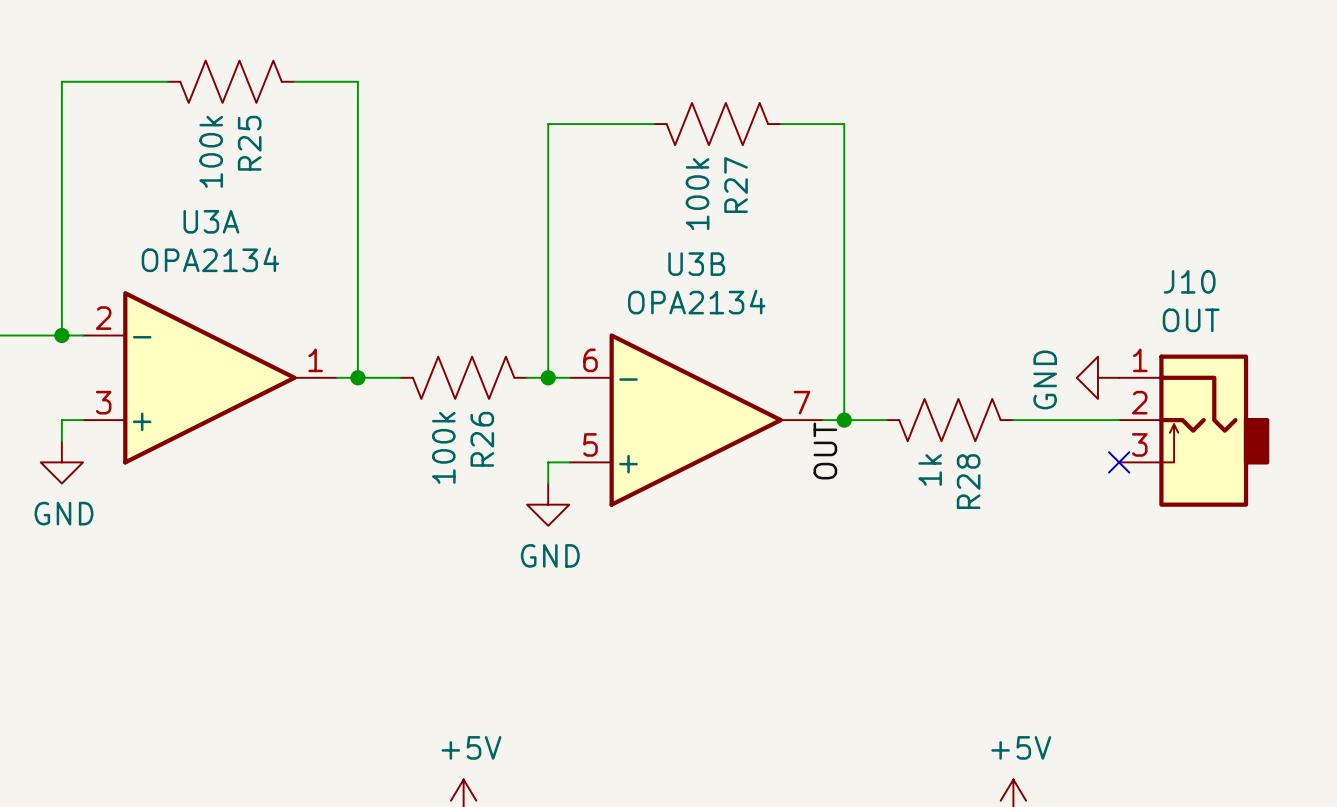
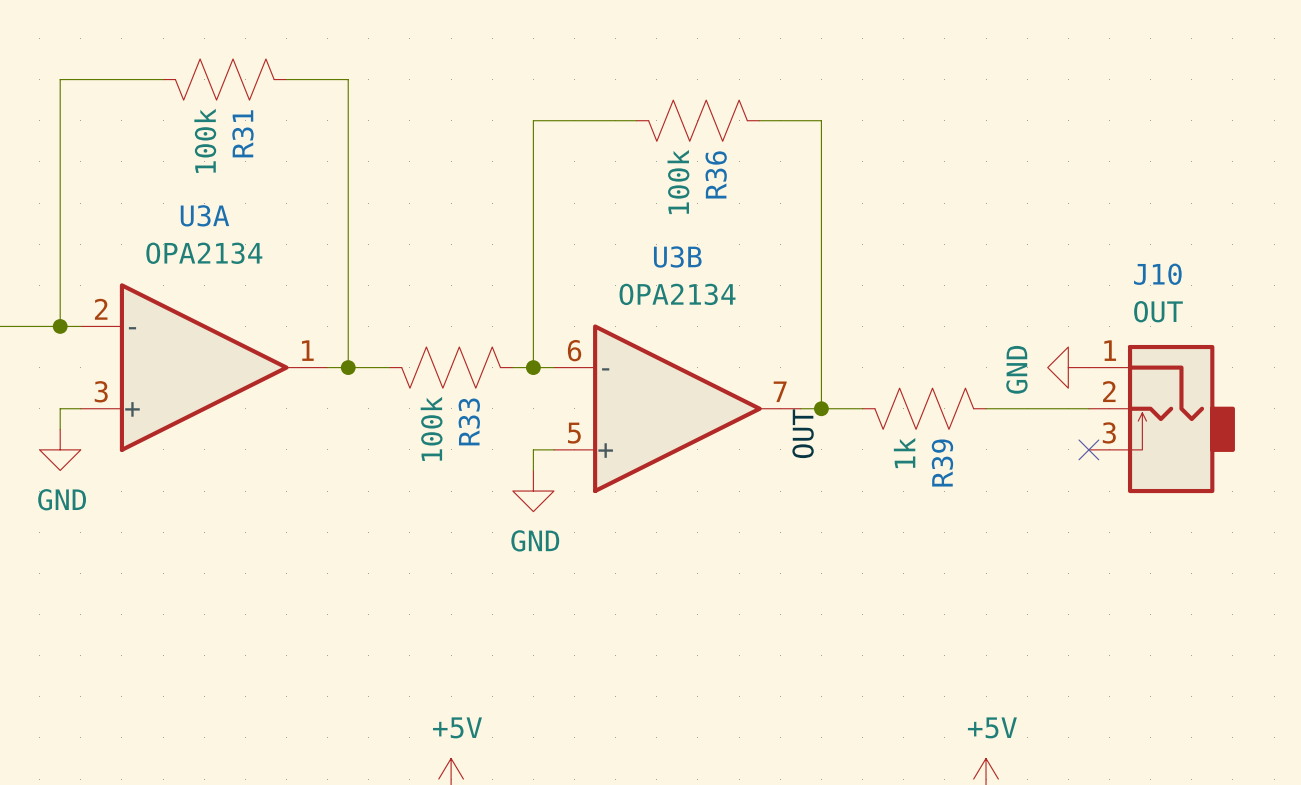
R25 name: R25 (249, 143) -> R31 (242, 133)
R27 name: R27 (736, 185) -> R36 (716, 174)
R26 name: R26 (482, 439) -> R33 (469, 421)
R28 name: R28 (968, 481) -> R39 (942, 463)

